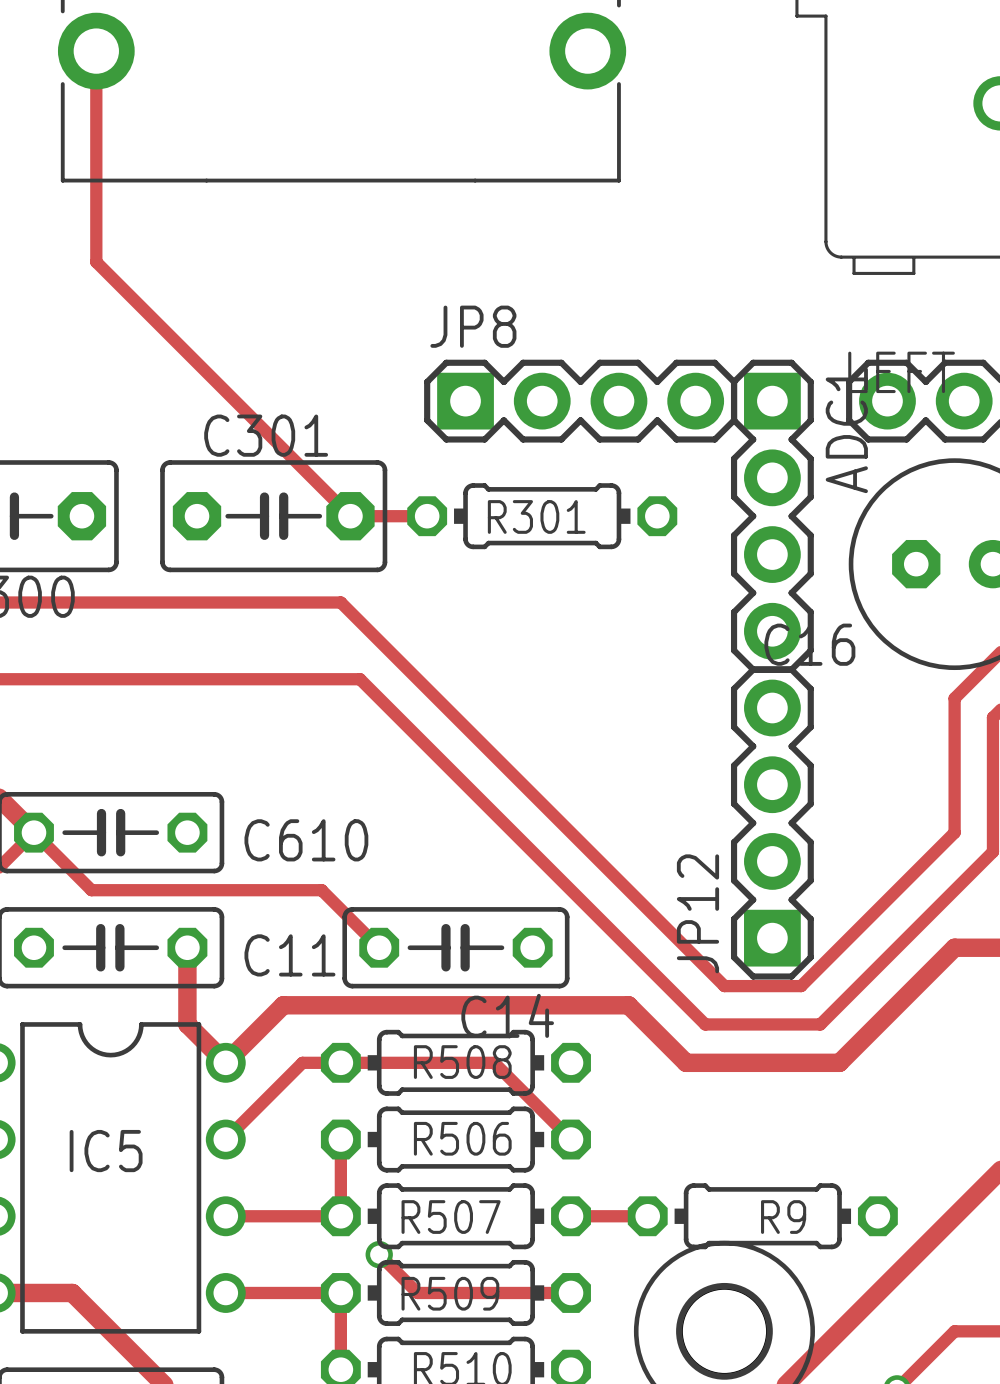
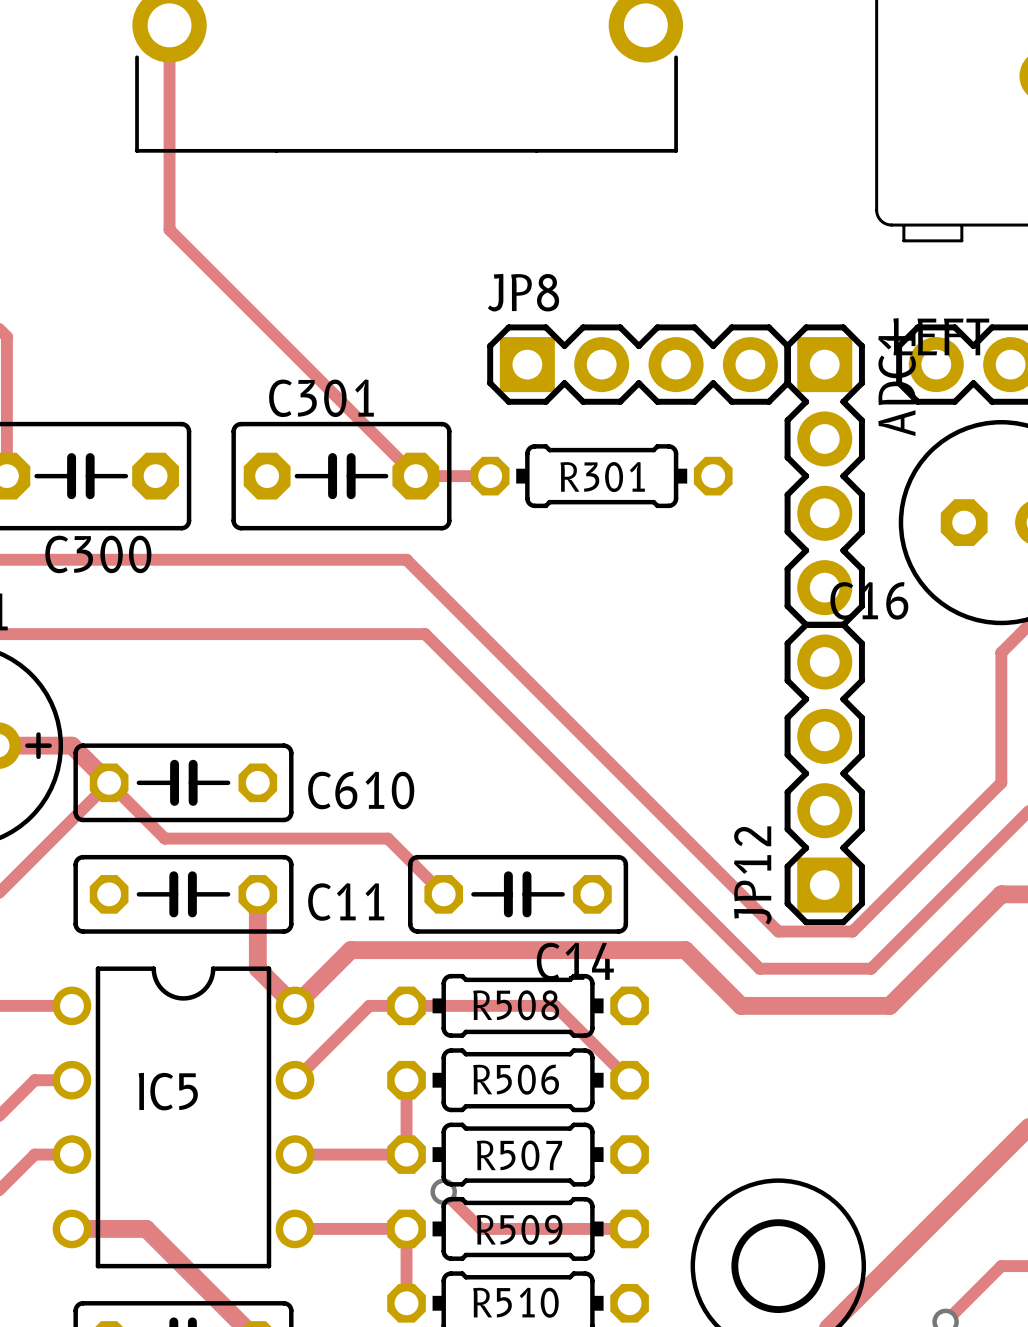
track: (571, 1216) (647, 1216) -> none
R9: (762, 1216) -> none

